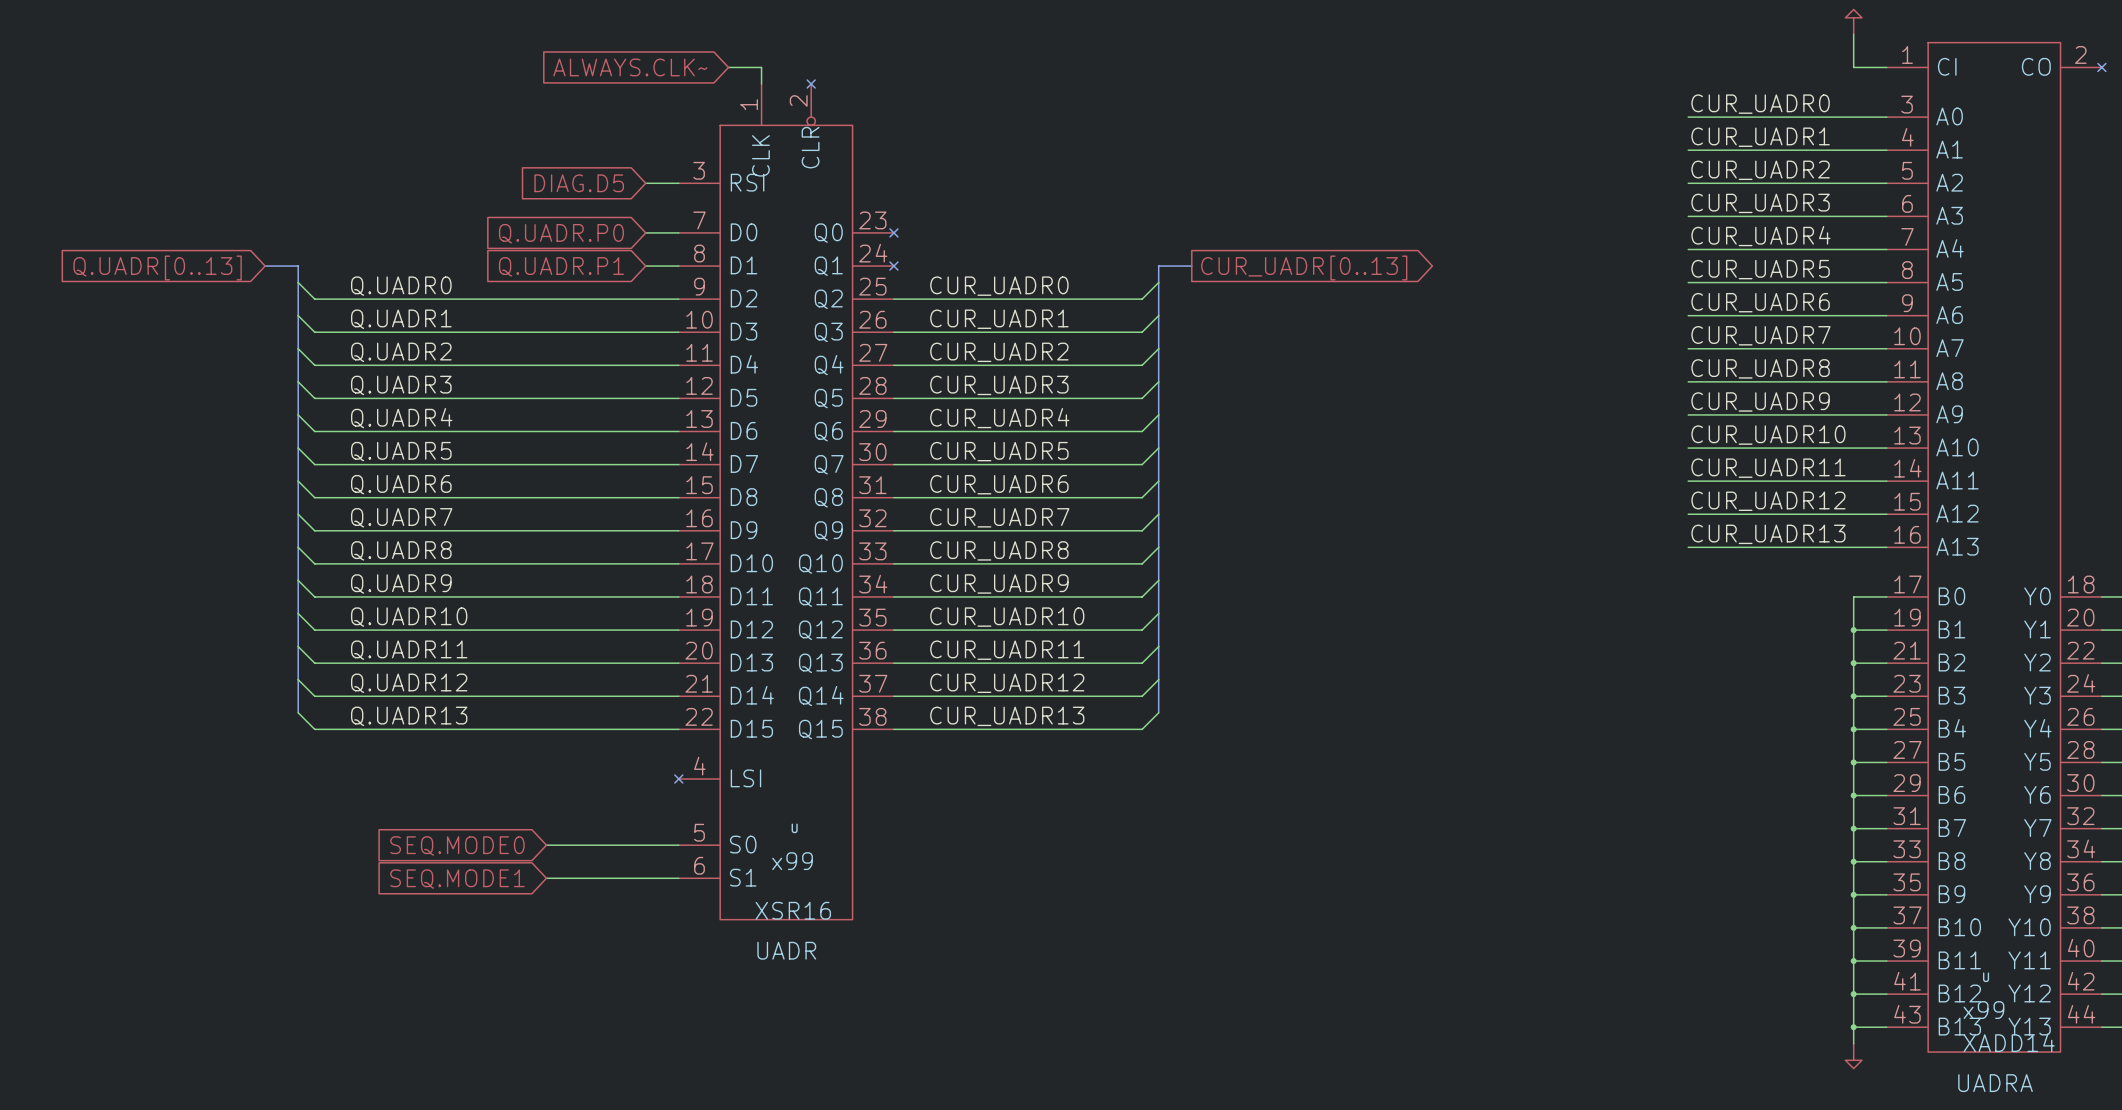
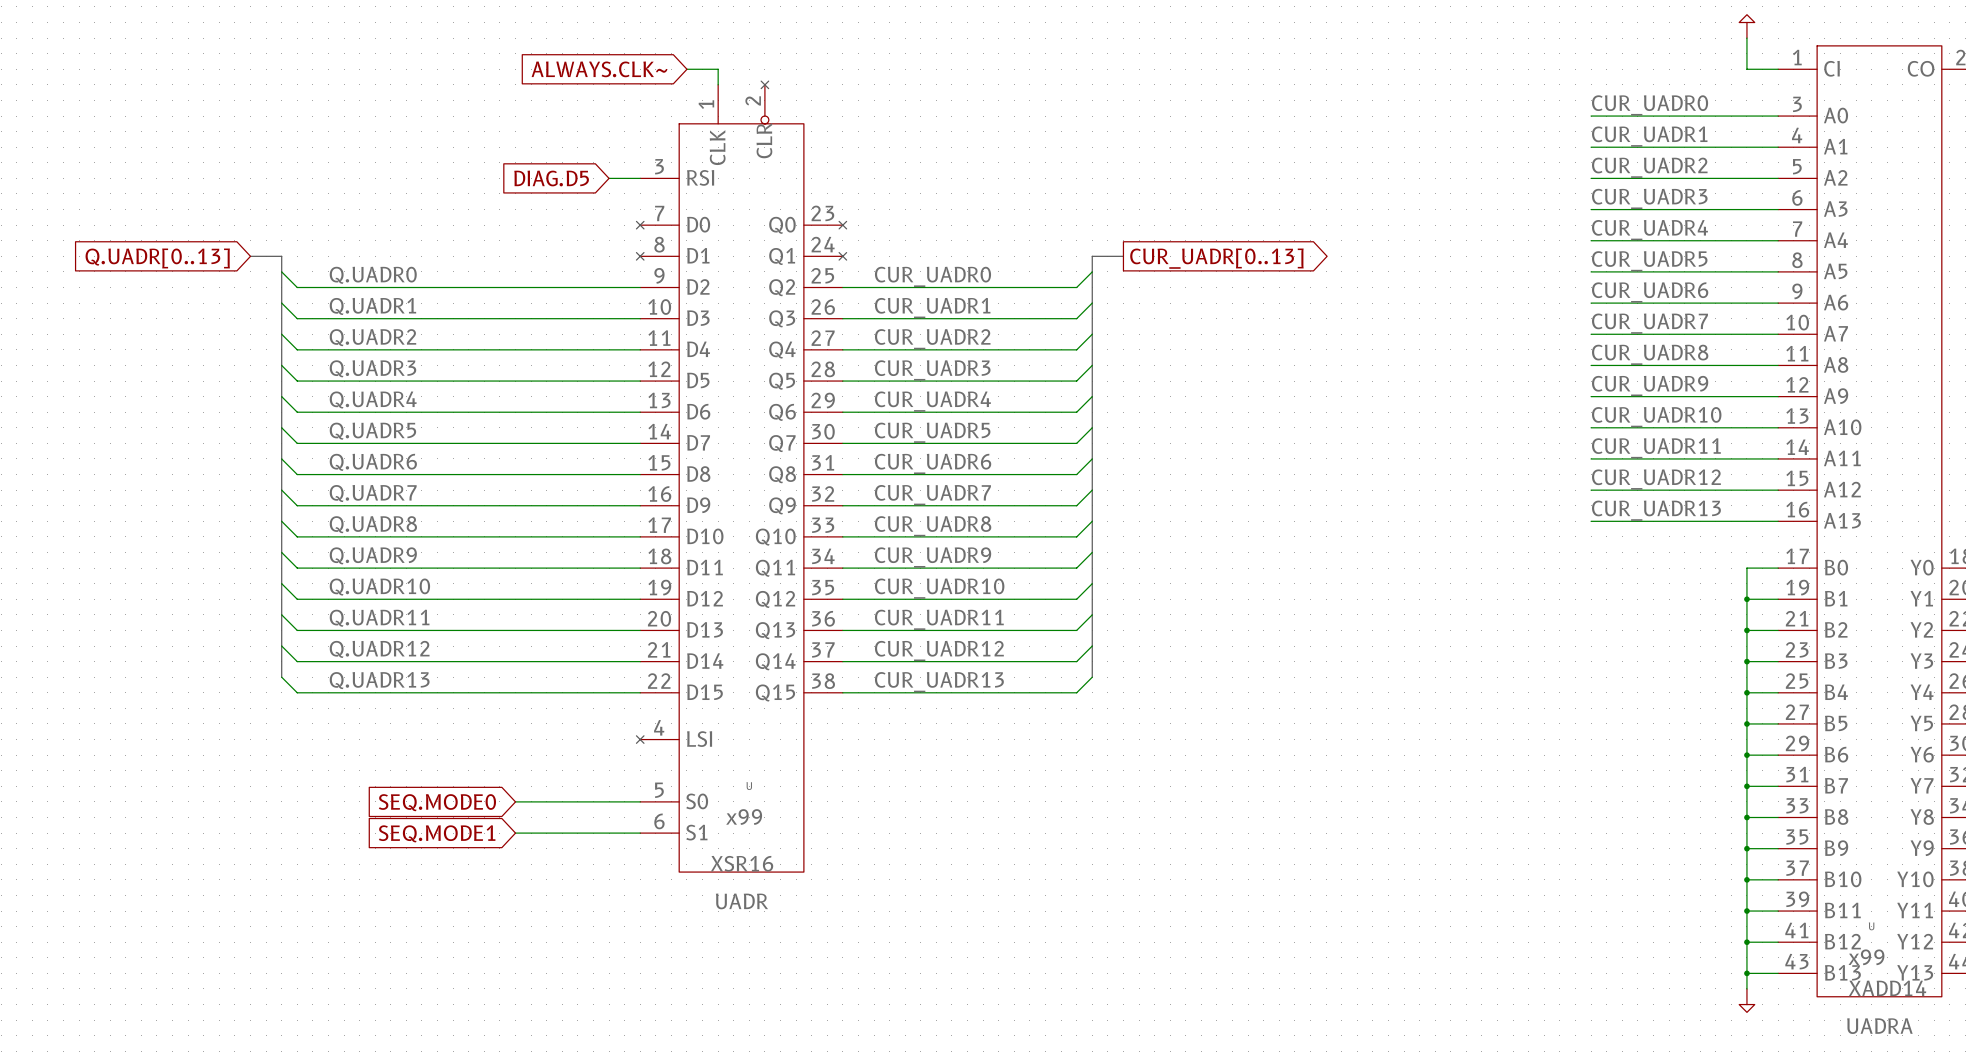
wire: (645, 232) (678, 232) -> none
no-connect mark: none -> (640, 225)
global label: Q.UADR.P0 (561, 233) -> none
global label: Q.UADR.P1 (561, 266) -> none
wire: (645, 266) (678, 266) -> none
no-connect mark: none -> (640, 256)

